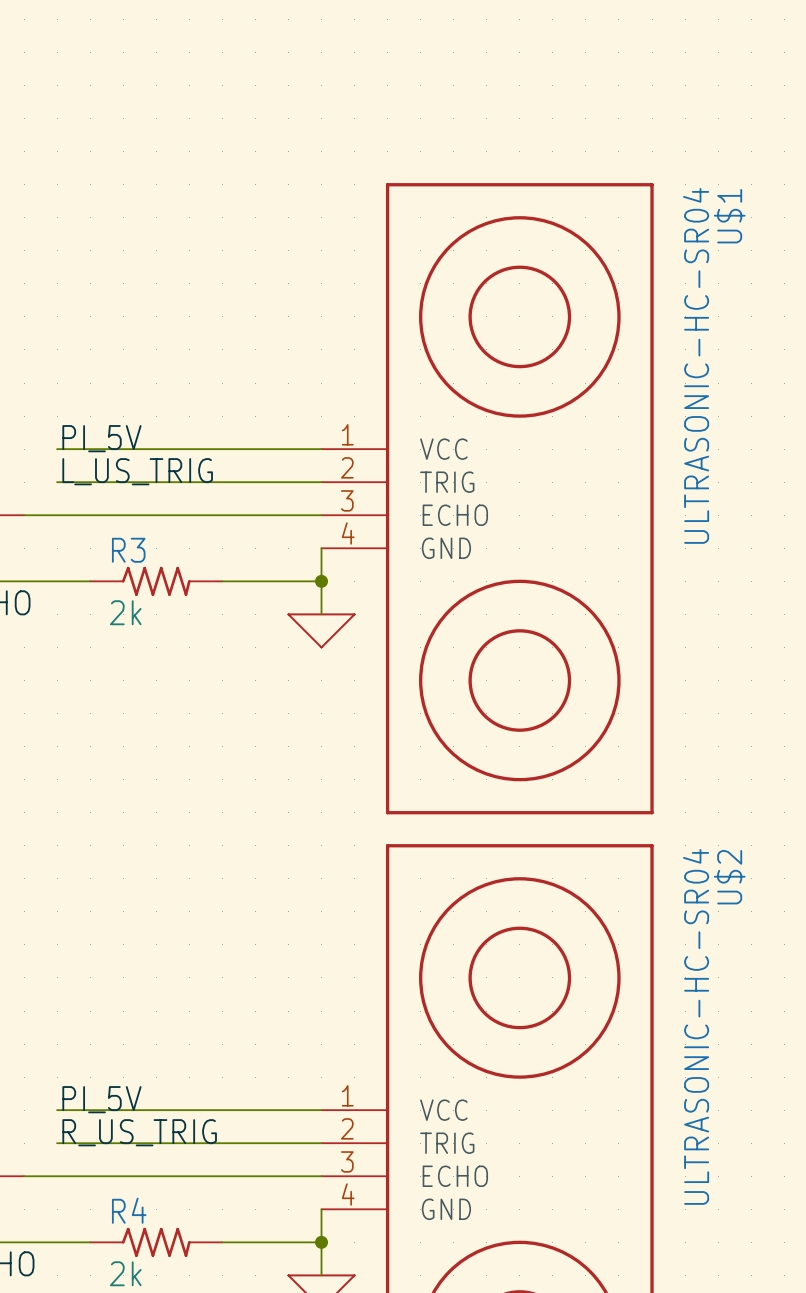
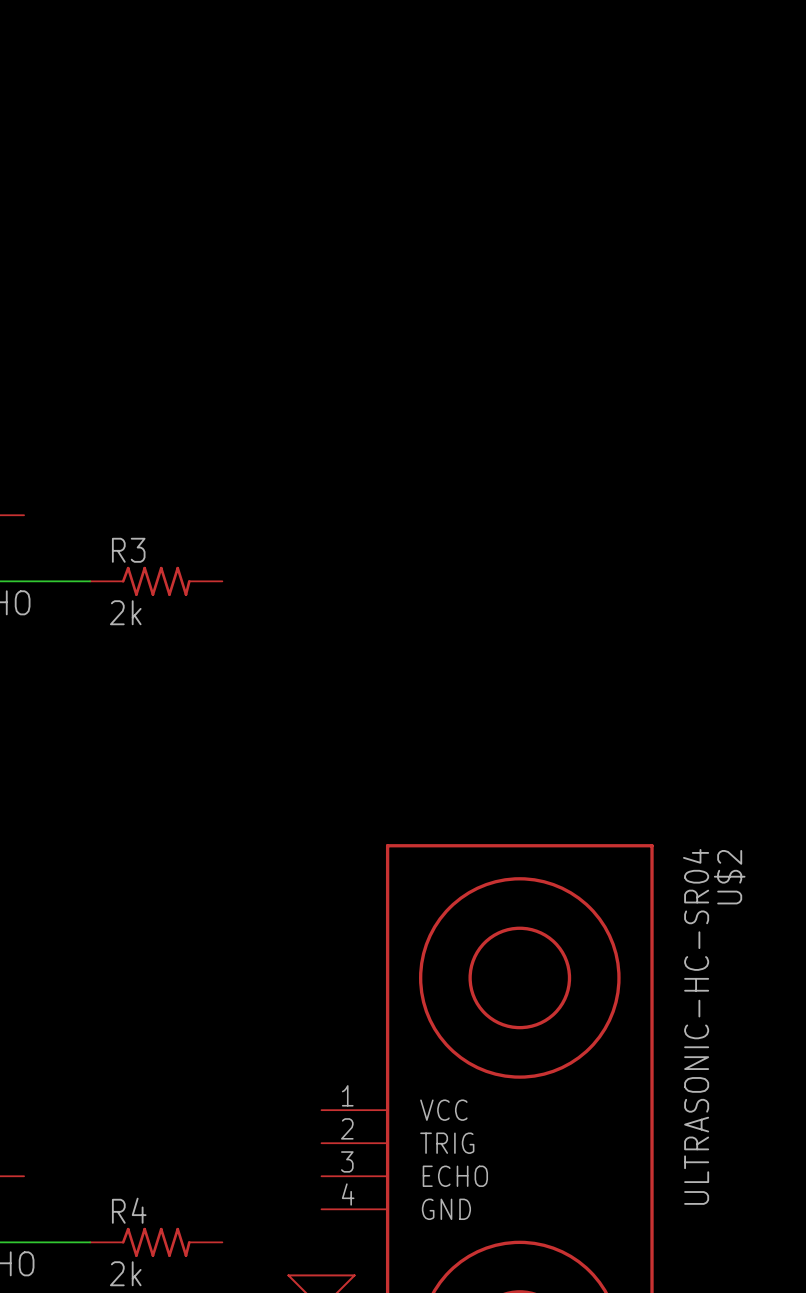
label: PI_5V (101, 438) -> none
wire: (57, 449) (321, 449) -> none
label: L_US_TRIG (137, 471) -> none
wire: (57, 482) (321, 482) -> none
U$1: ULTRASONIC-HC-SR04 (487, 498) -> none
wire: (24, 515) (321, 515) -> none
wire: (321, 548) (321, 614) -> none
wire: (222, 581) (321, 581) -> none
junction: (321, 581) -> none
power symbol: (321, 630) -> none
label: PI_5V (101, 1099) -> none
wire: (57, 1110) (321, 1110) -> none
label: R_US_TRIG (139, 1132) -> none
wire: (57, 1143) (321, 1143) -> none
wire: (24, 1176) (321, 1176) -> none
wire: (321, 1209) (321, 1275) -> none
wire: (222, 1242) (321, 1242) -> none
junction: (321, 1242) -> none

